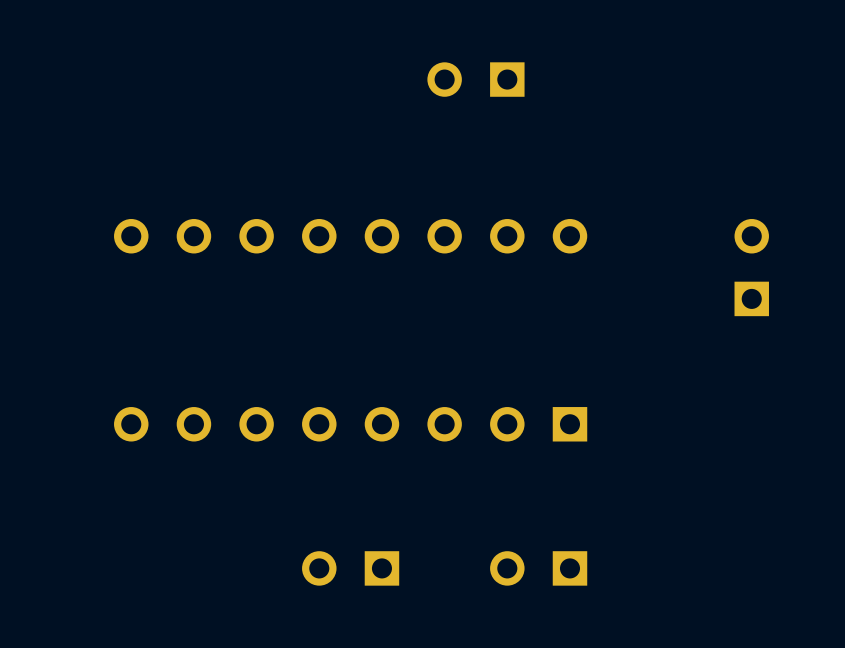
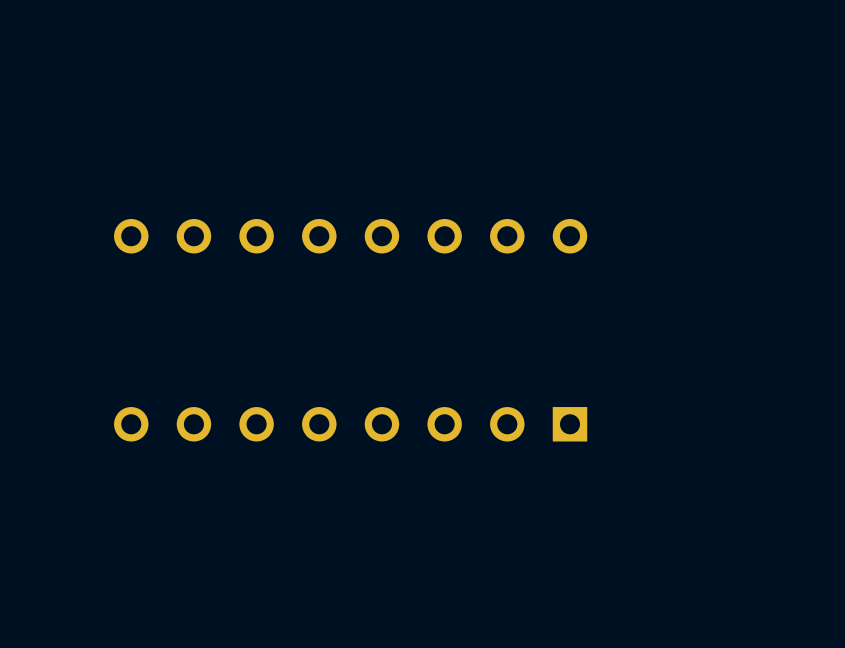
part: (475, 79) -> none
part: (751, 267) -> none
part: (350, 568) -> none
part: (538, 568) -> none

